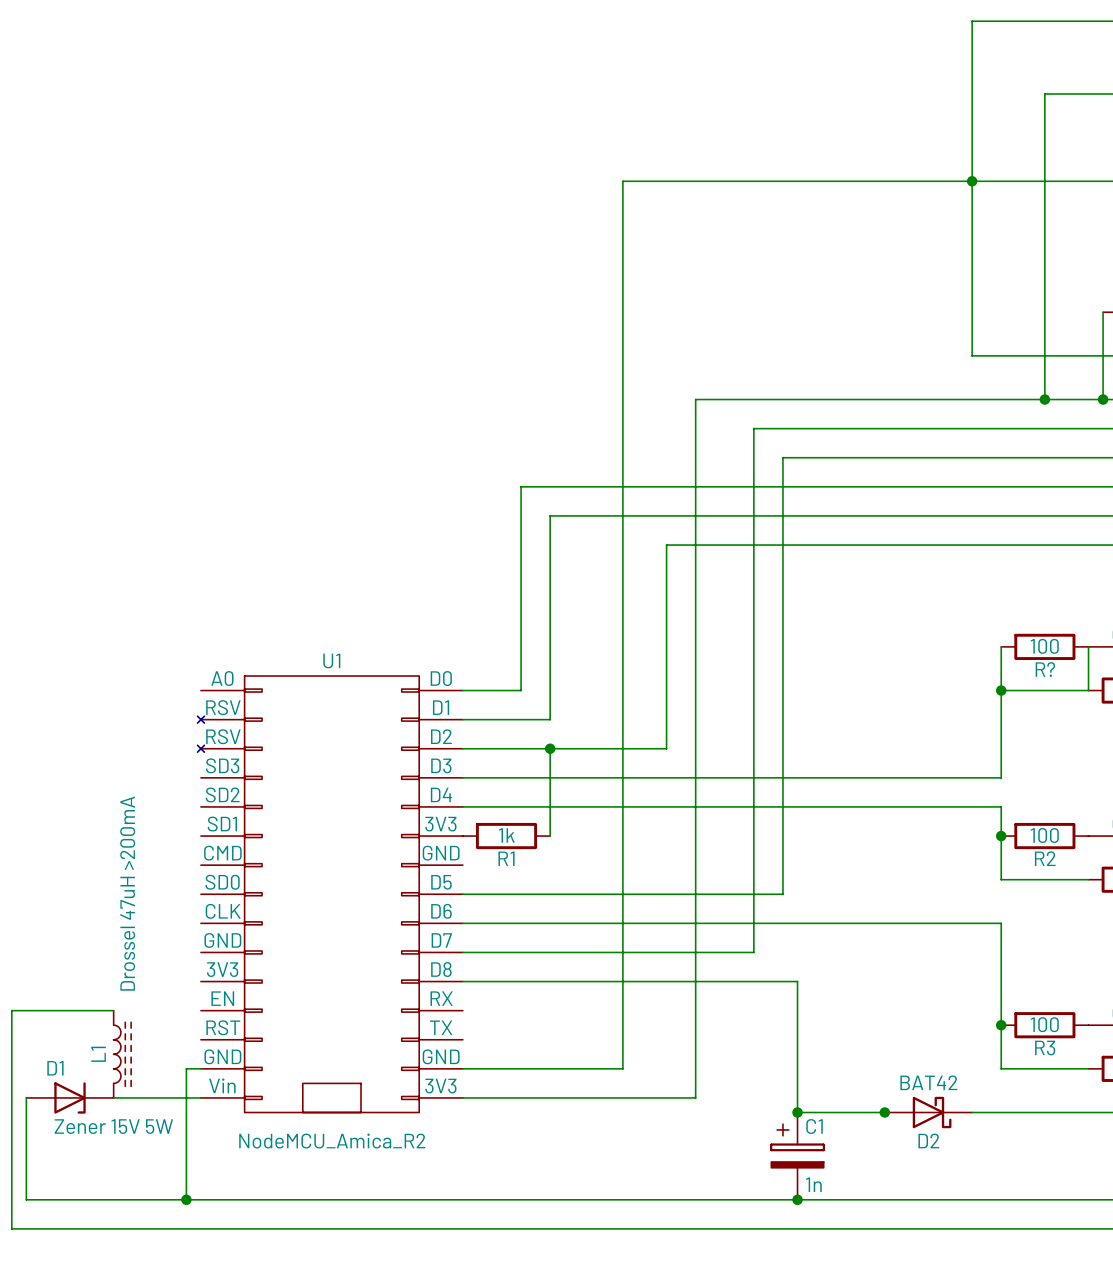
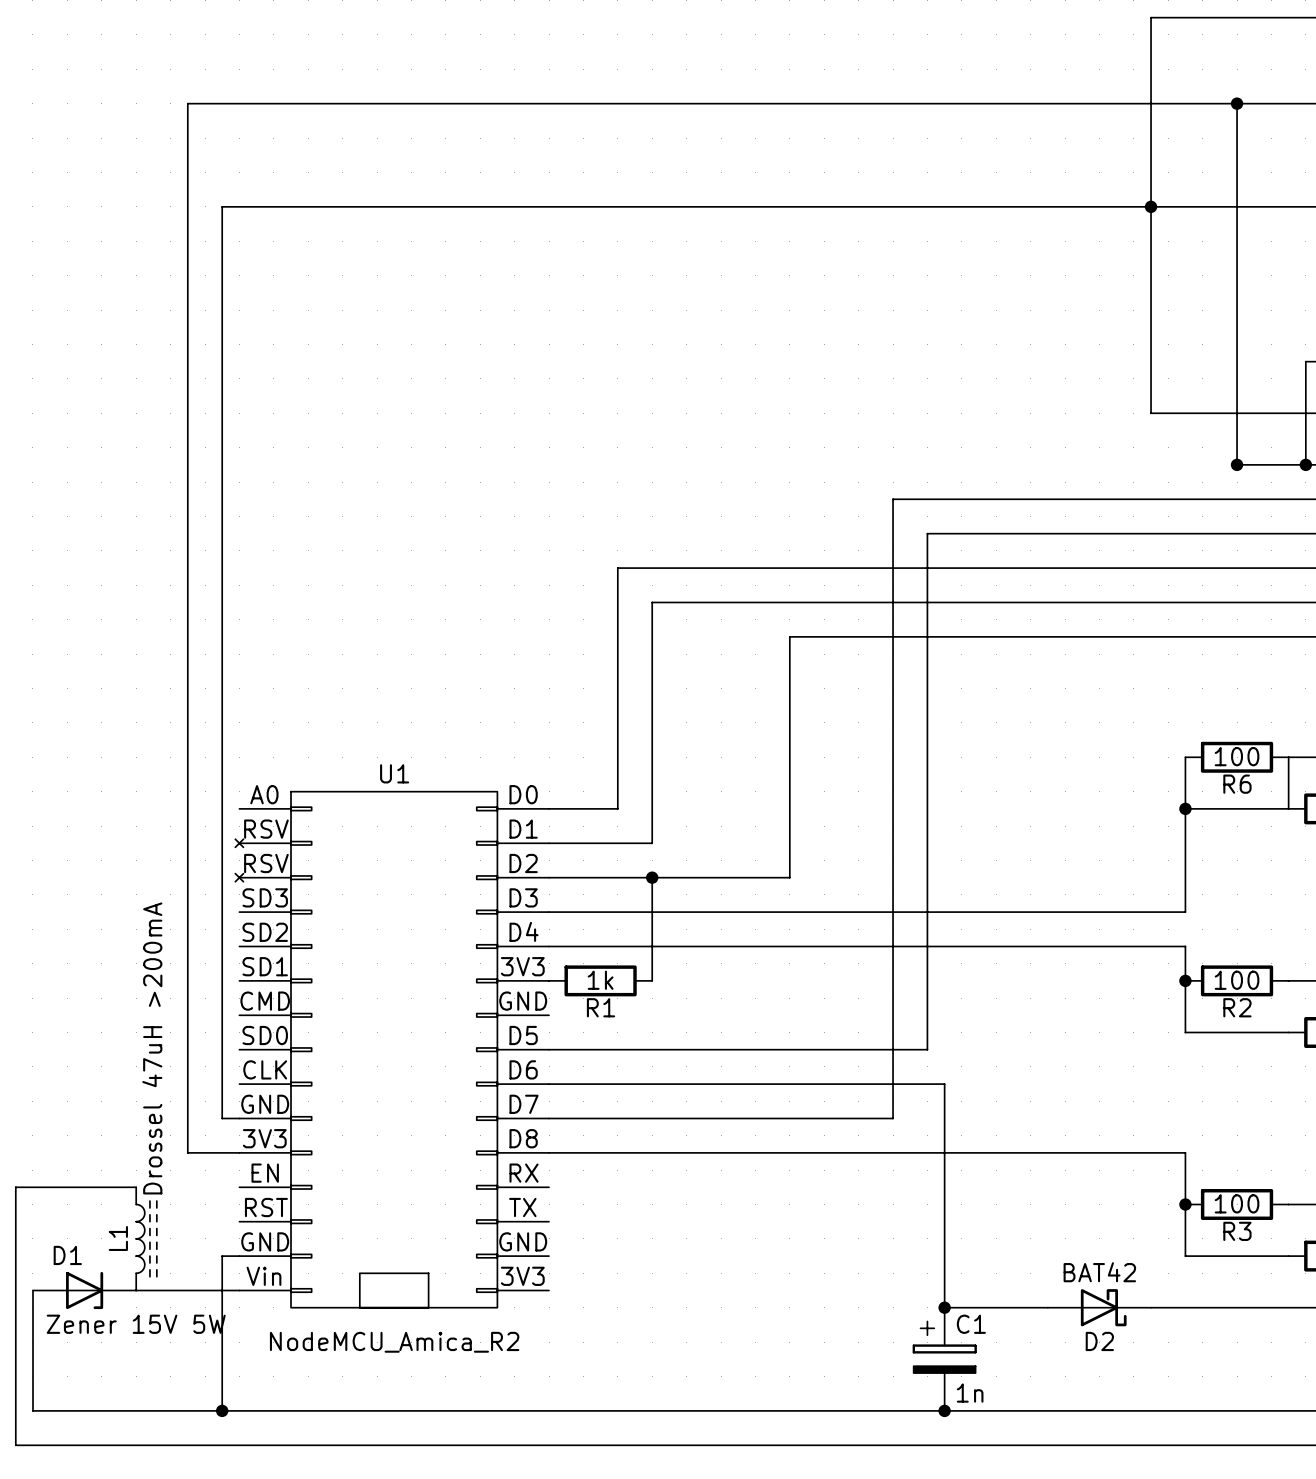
wire: none -> (1237, 103) (187, 103) (187, 1152) (239, 1152)
junction: none -> (1237, 103)
wire: (622, 181) (622, 1068) (462, 1068) -> (738, 206) (222, 206) (222, 1118) (239, 1118)
wire: (1044, 399) (695, 399) (695, 1097) (462, 1097) -> none
R? name: R? (1045, 669) -> R6 (1237, 784)
wire: (797, 923) (1001, 923) (1001, 981) -> (944, 1084) (944, 1152) (1185, 1152)
junction: (884, 1112) -> none

